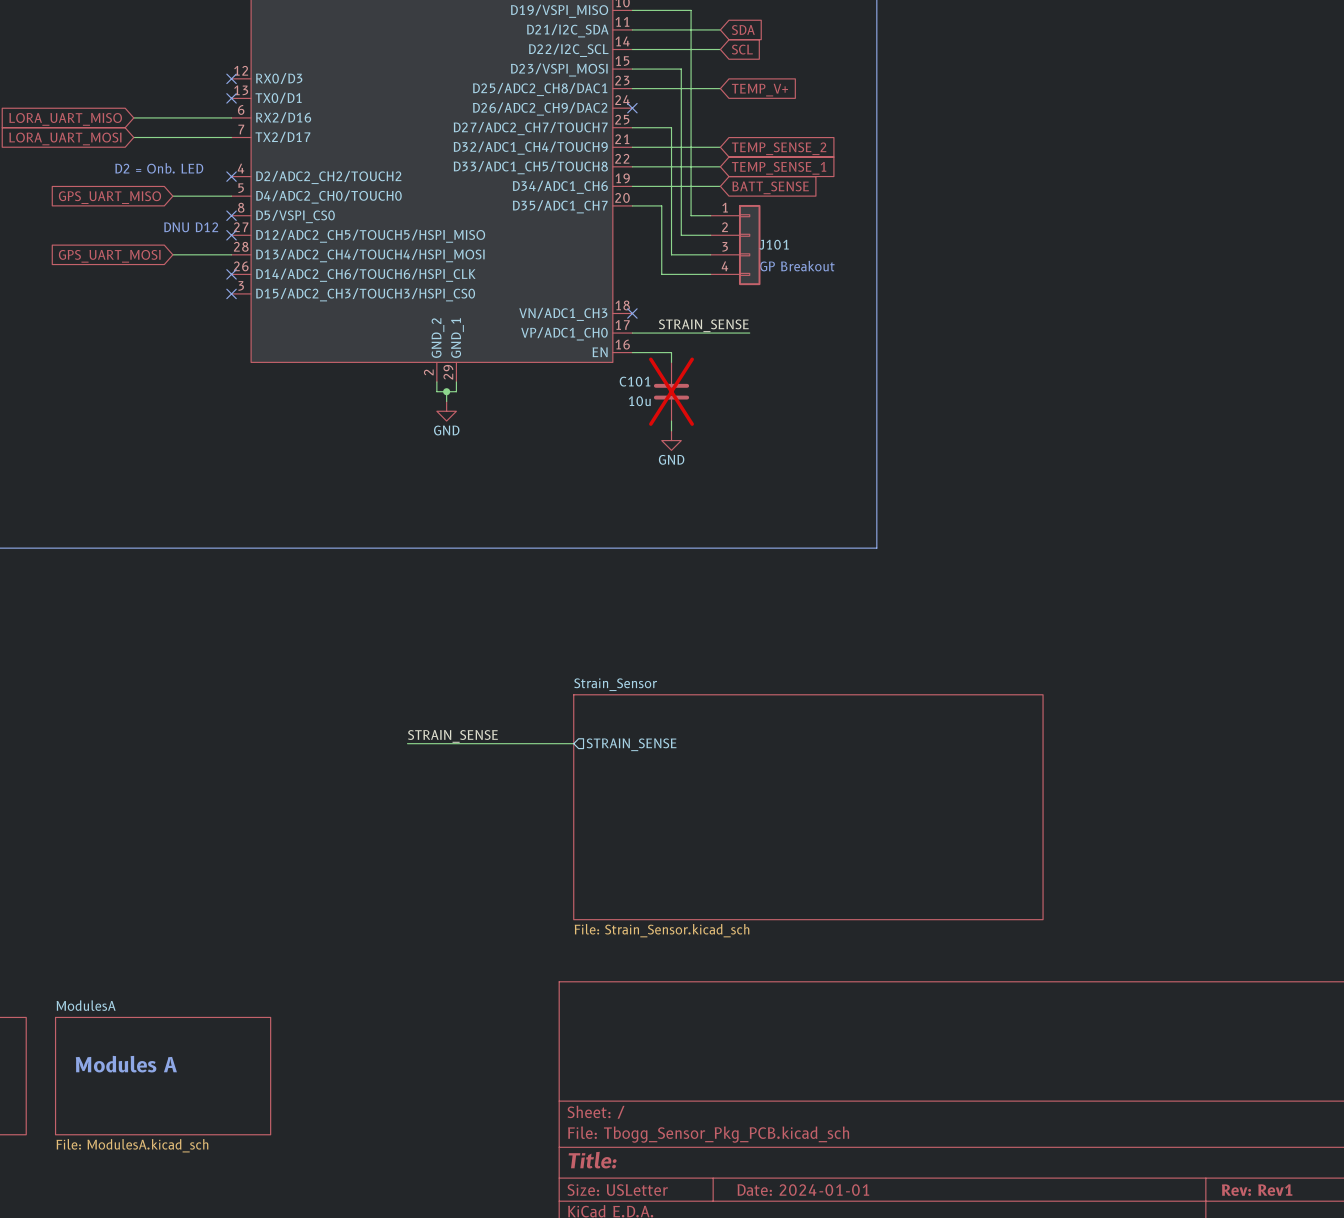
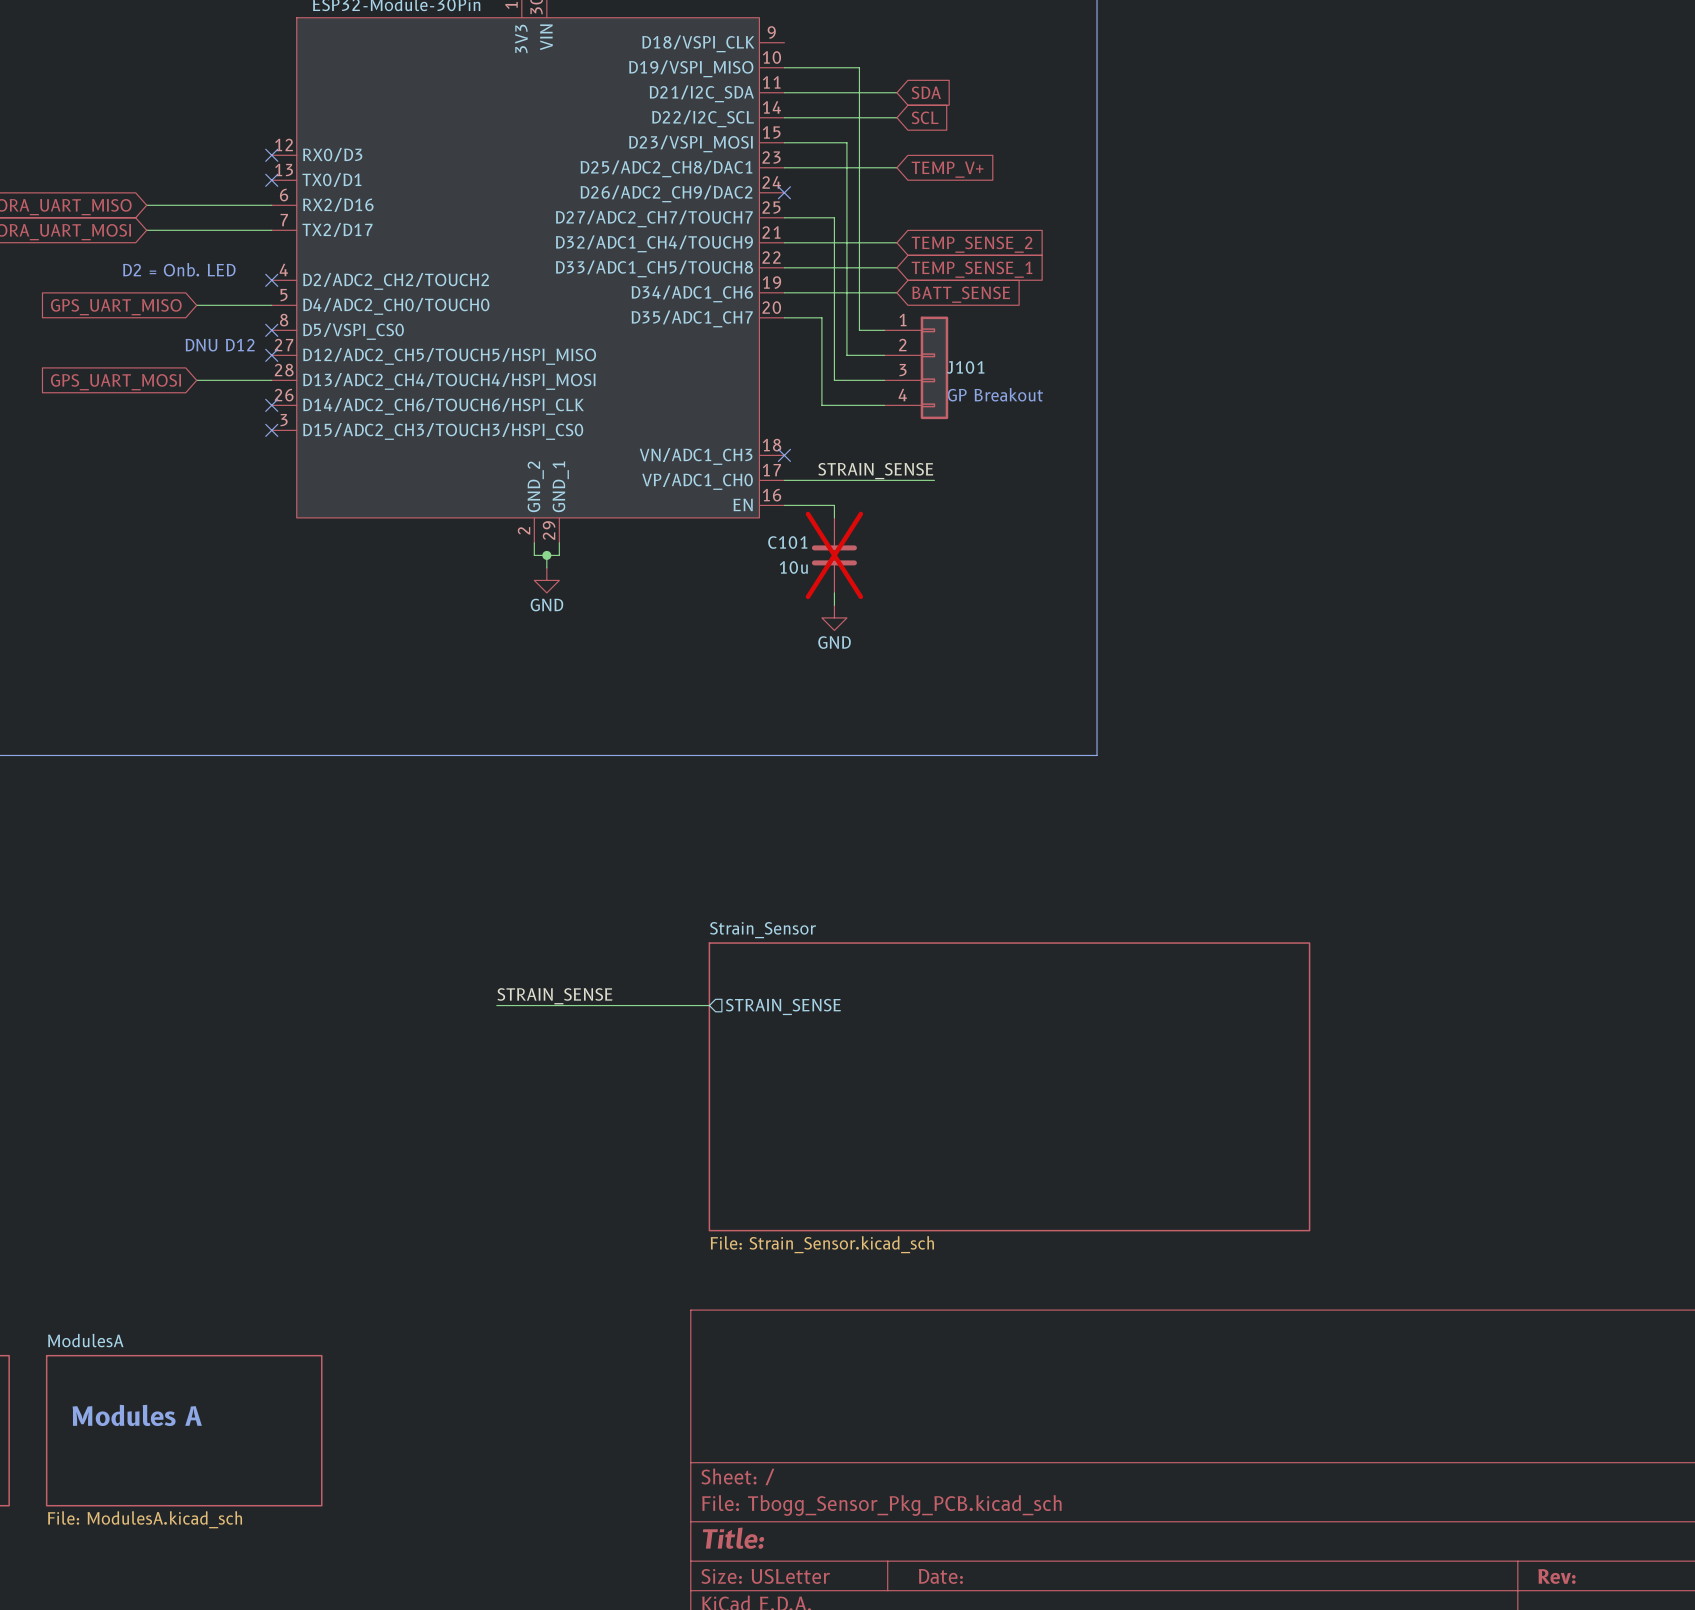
title block: Date: 2024-01-01 (803, 1190) -> Date: (940, 1576)
title block: Rev: Rev1 (1257, 1190) -> Rev: (1556, 1576)

